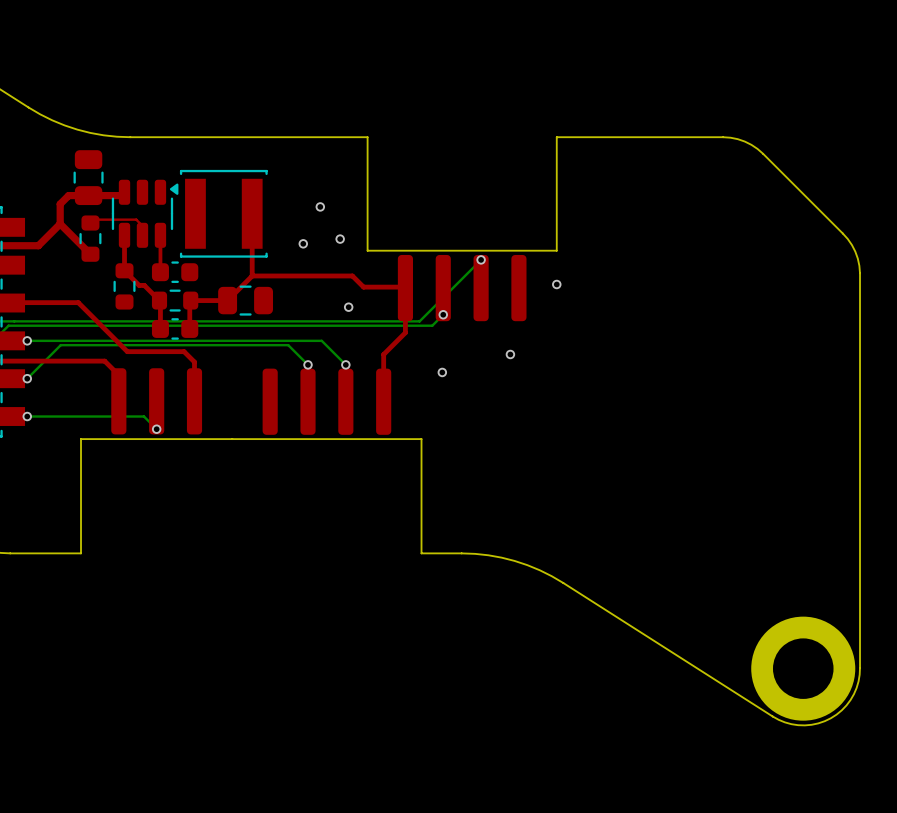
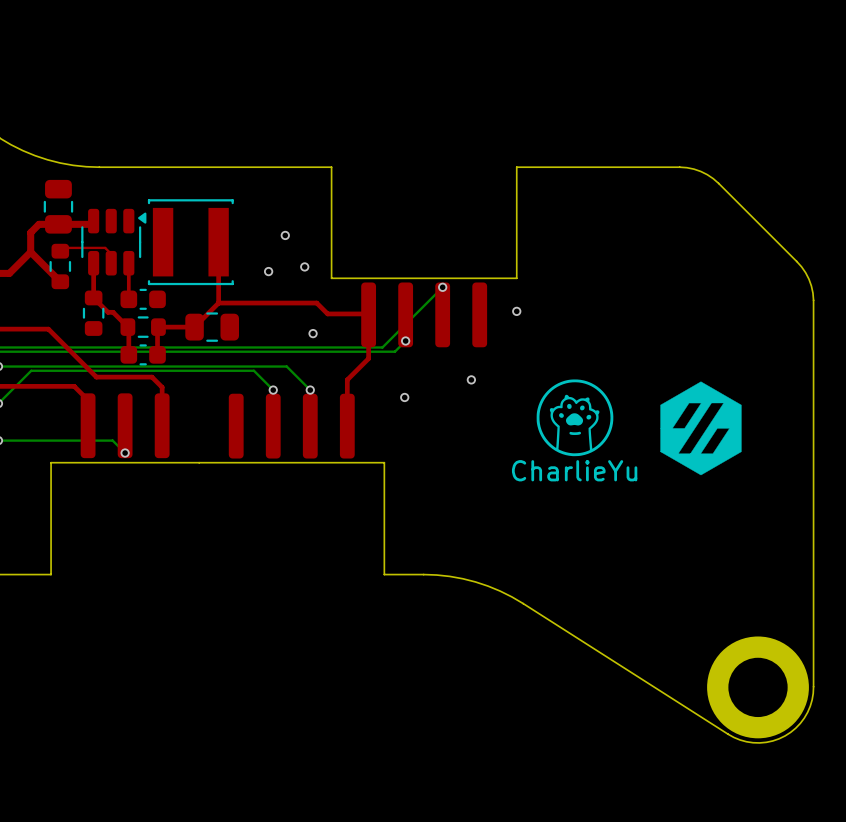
drawing: none -> [536, 379, 742, 476]

